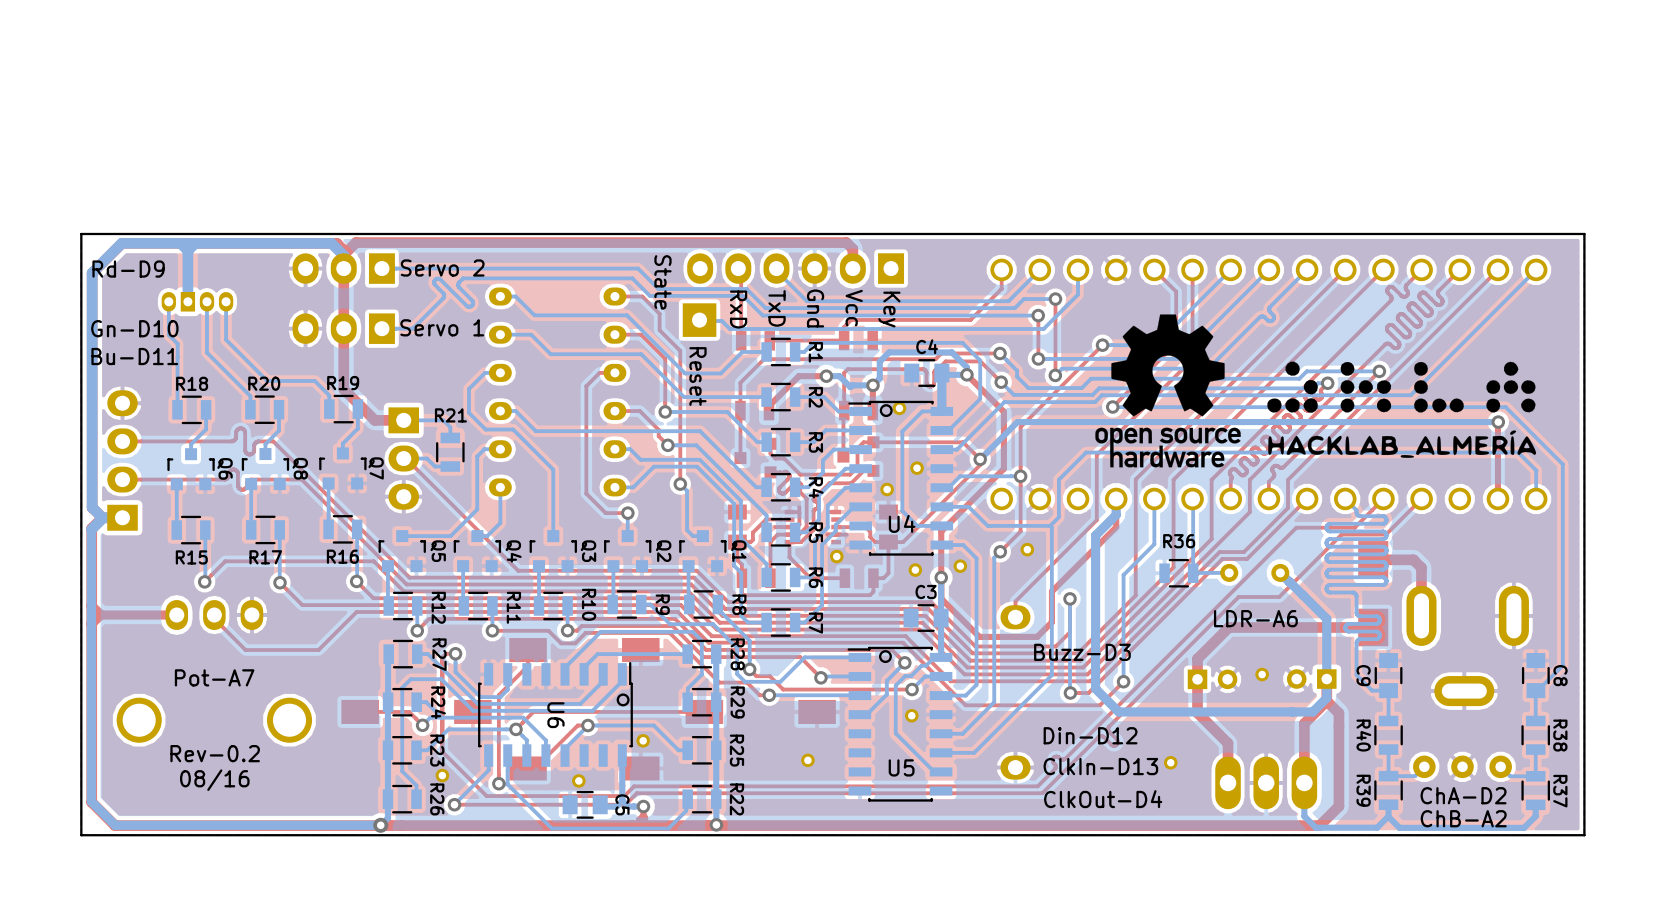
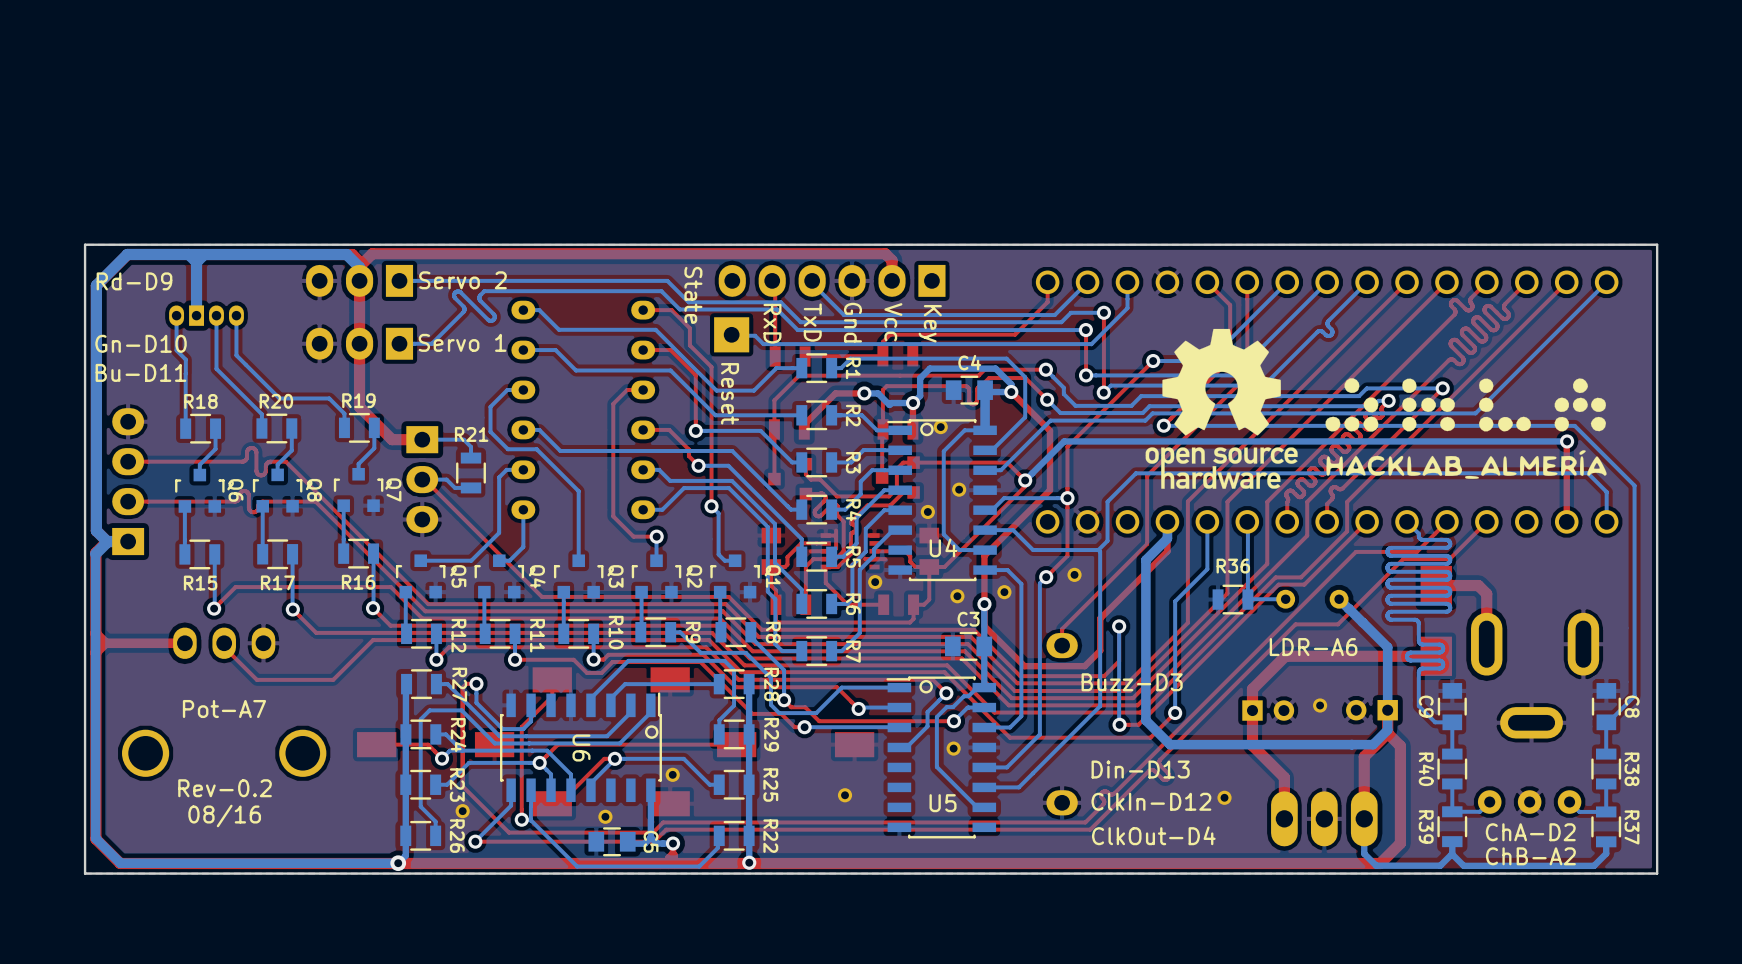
text: Din-D12 (1090, 735) -> Din-D13 (1140, 769)
text: ClkIn-D13 (1100, 766) -> ClkIn-D12 (1151, 801)

